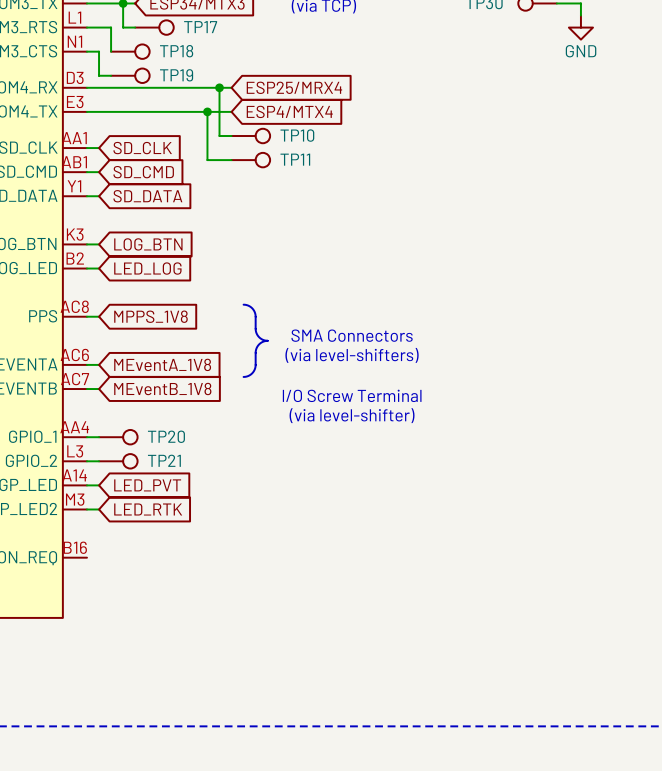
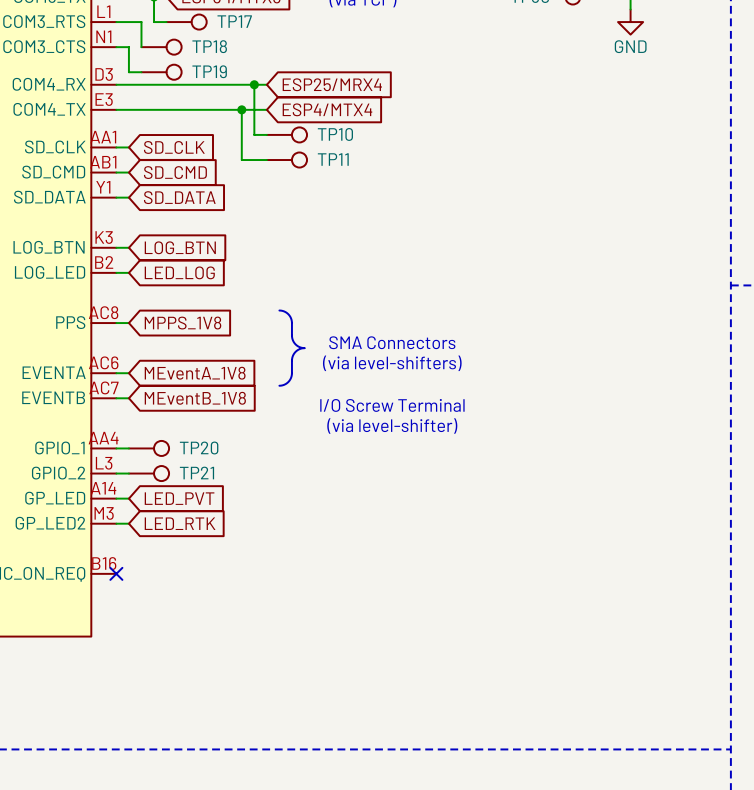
no-connect mark: none -> (116, 573)

